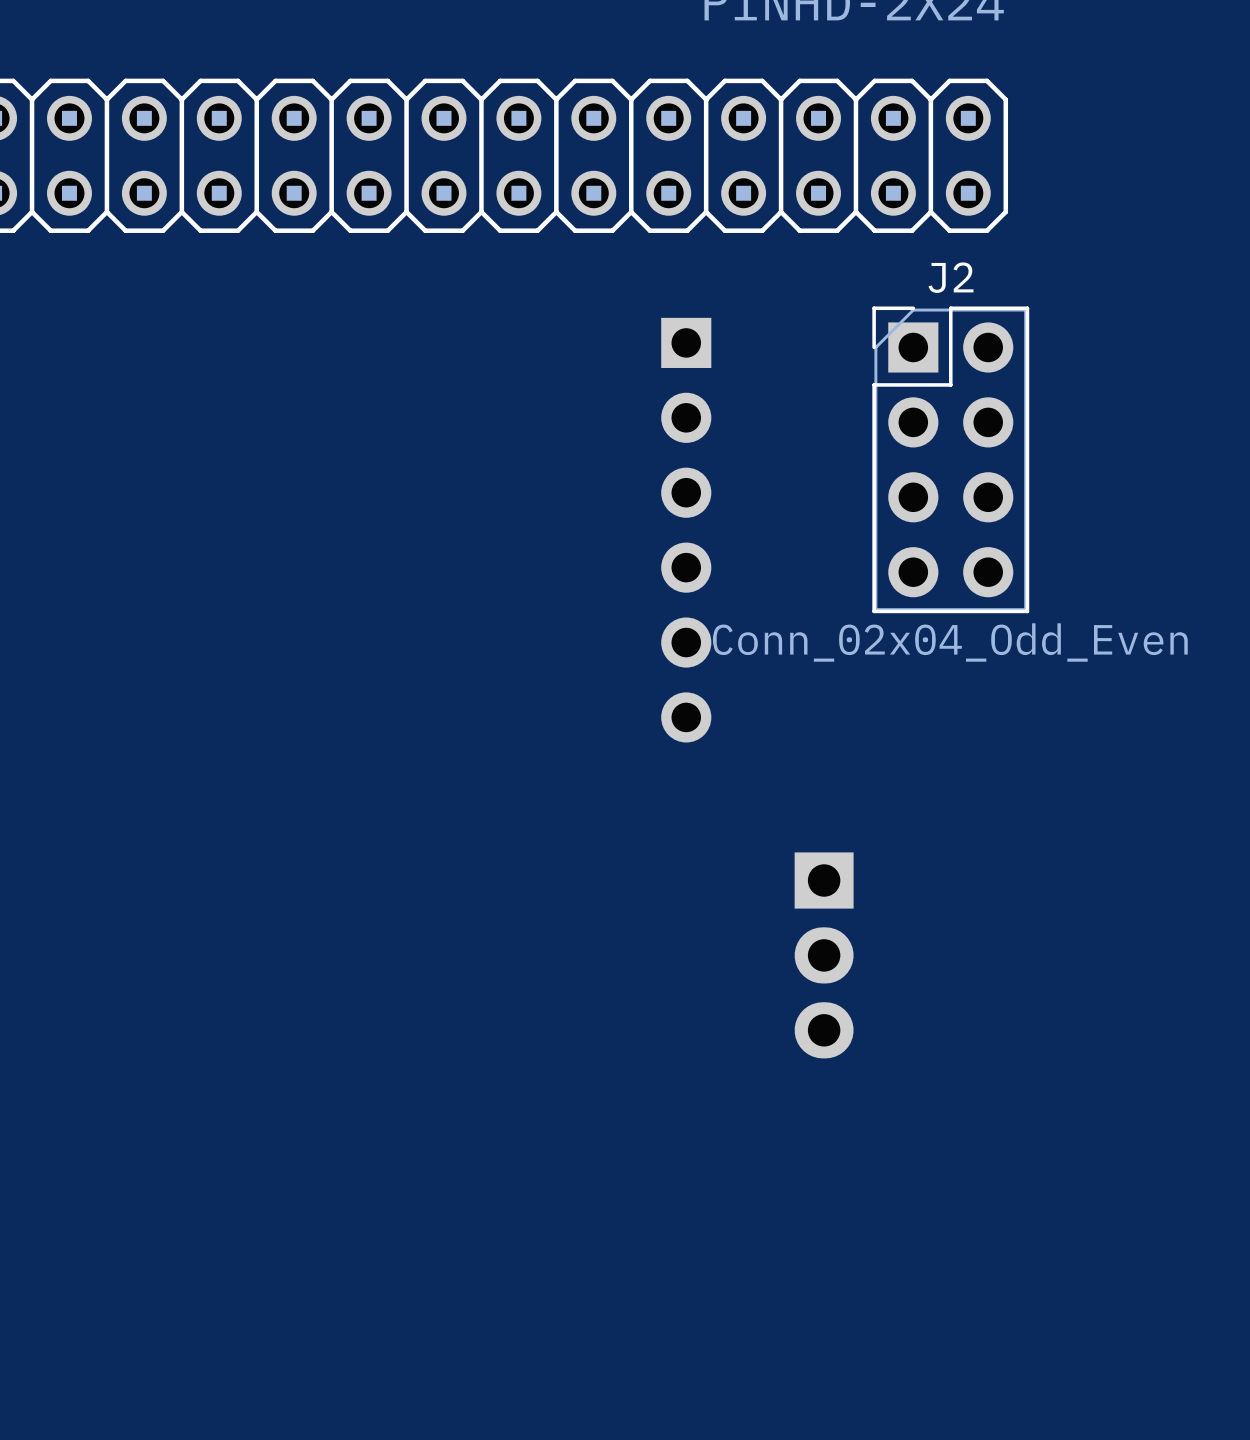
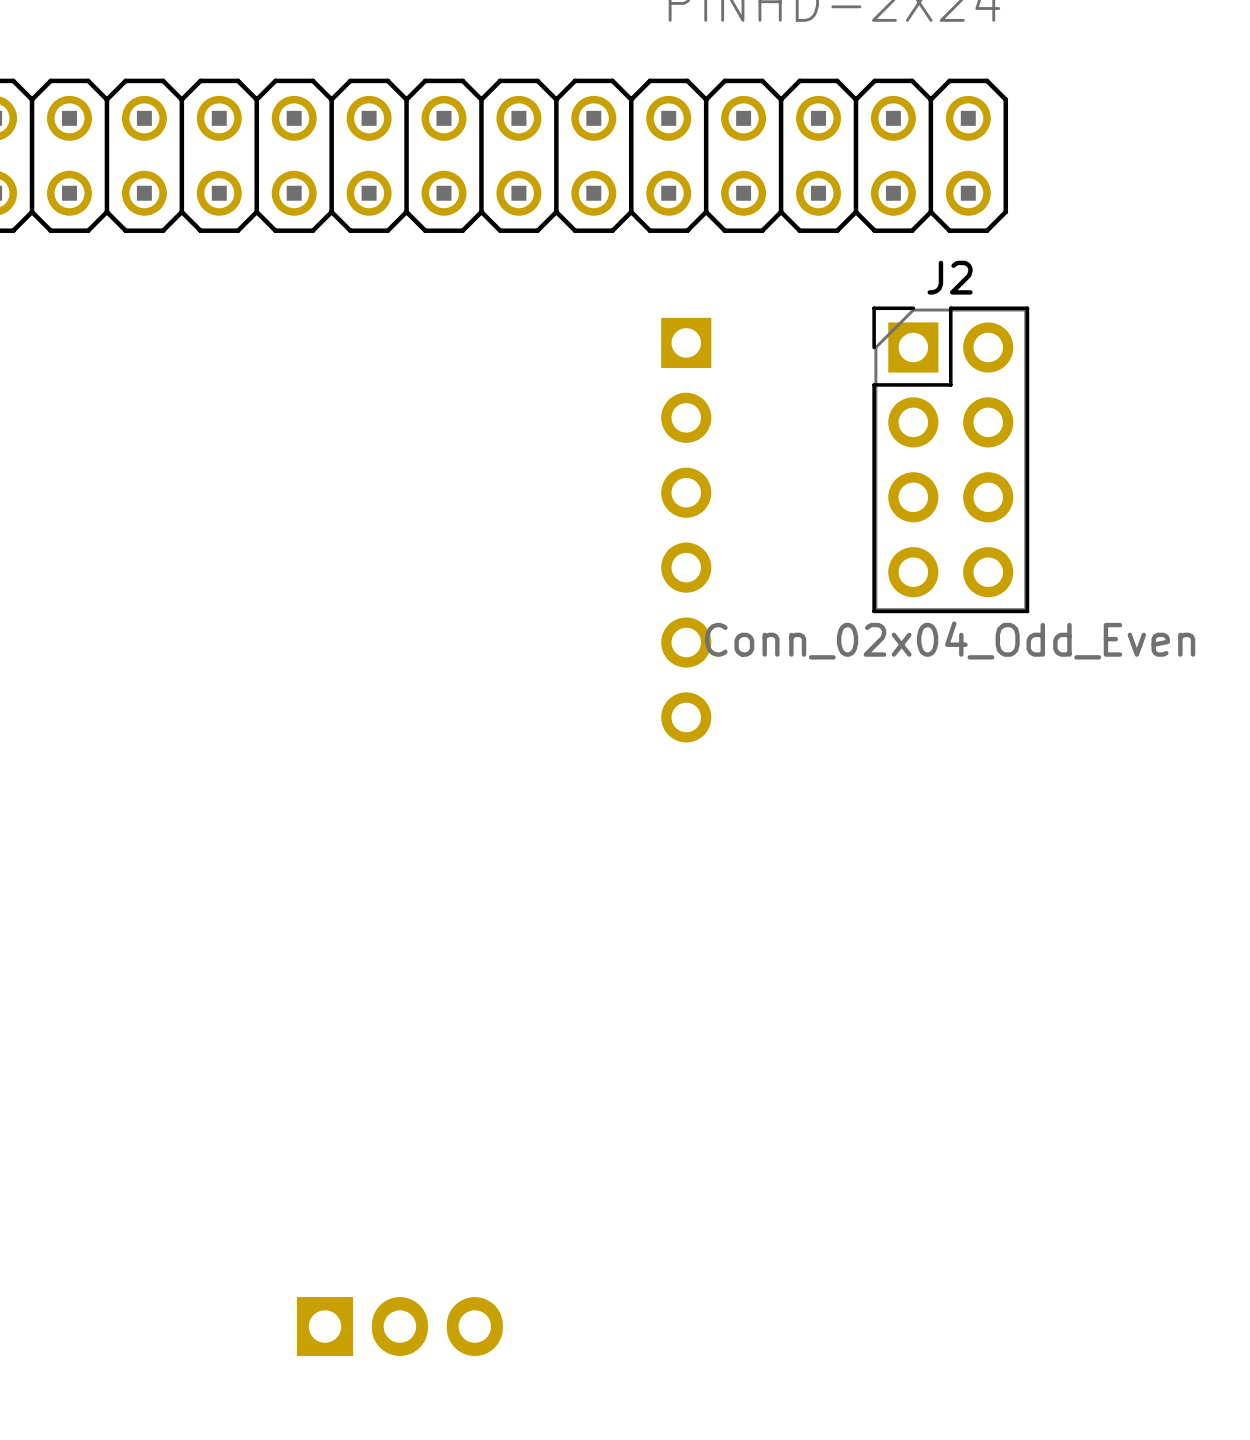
part rotation: 0° (824, 955) -> 90° counterclockwise (399, 1326)
part position: (824, 955) -> (399, 1326)

